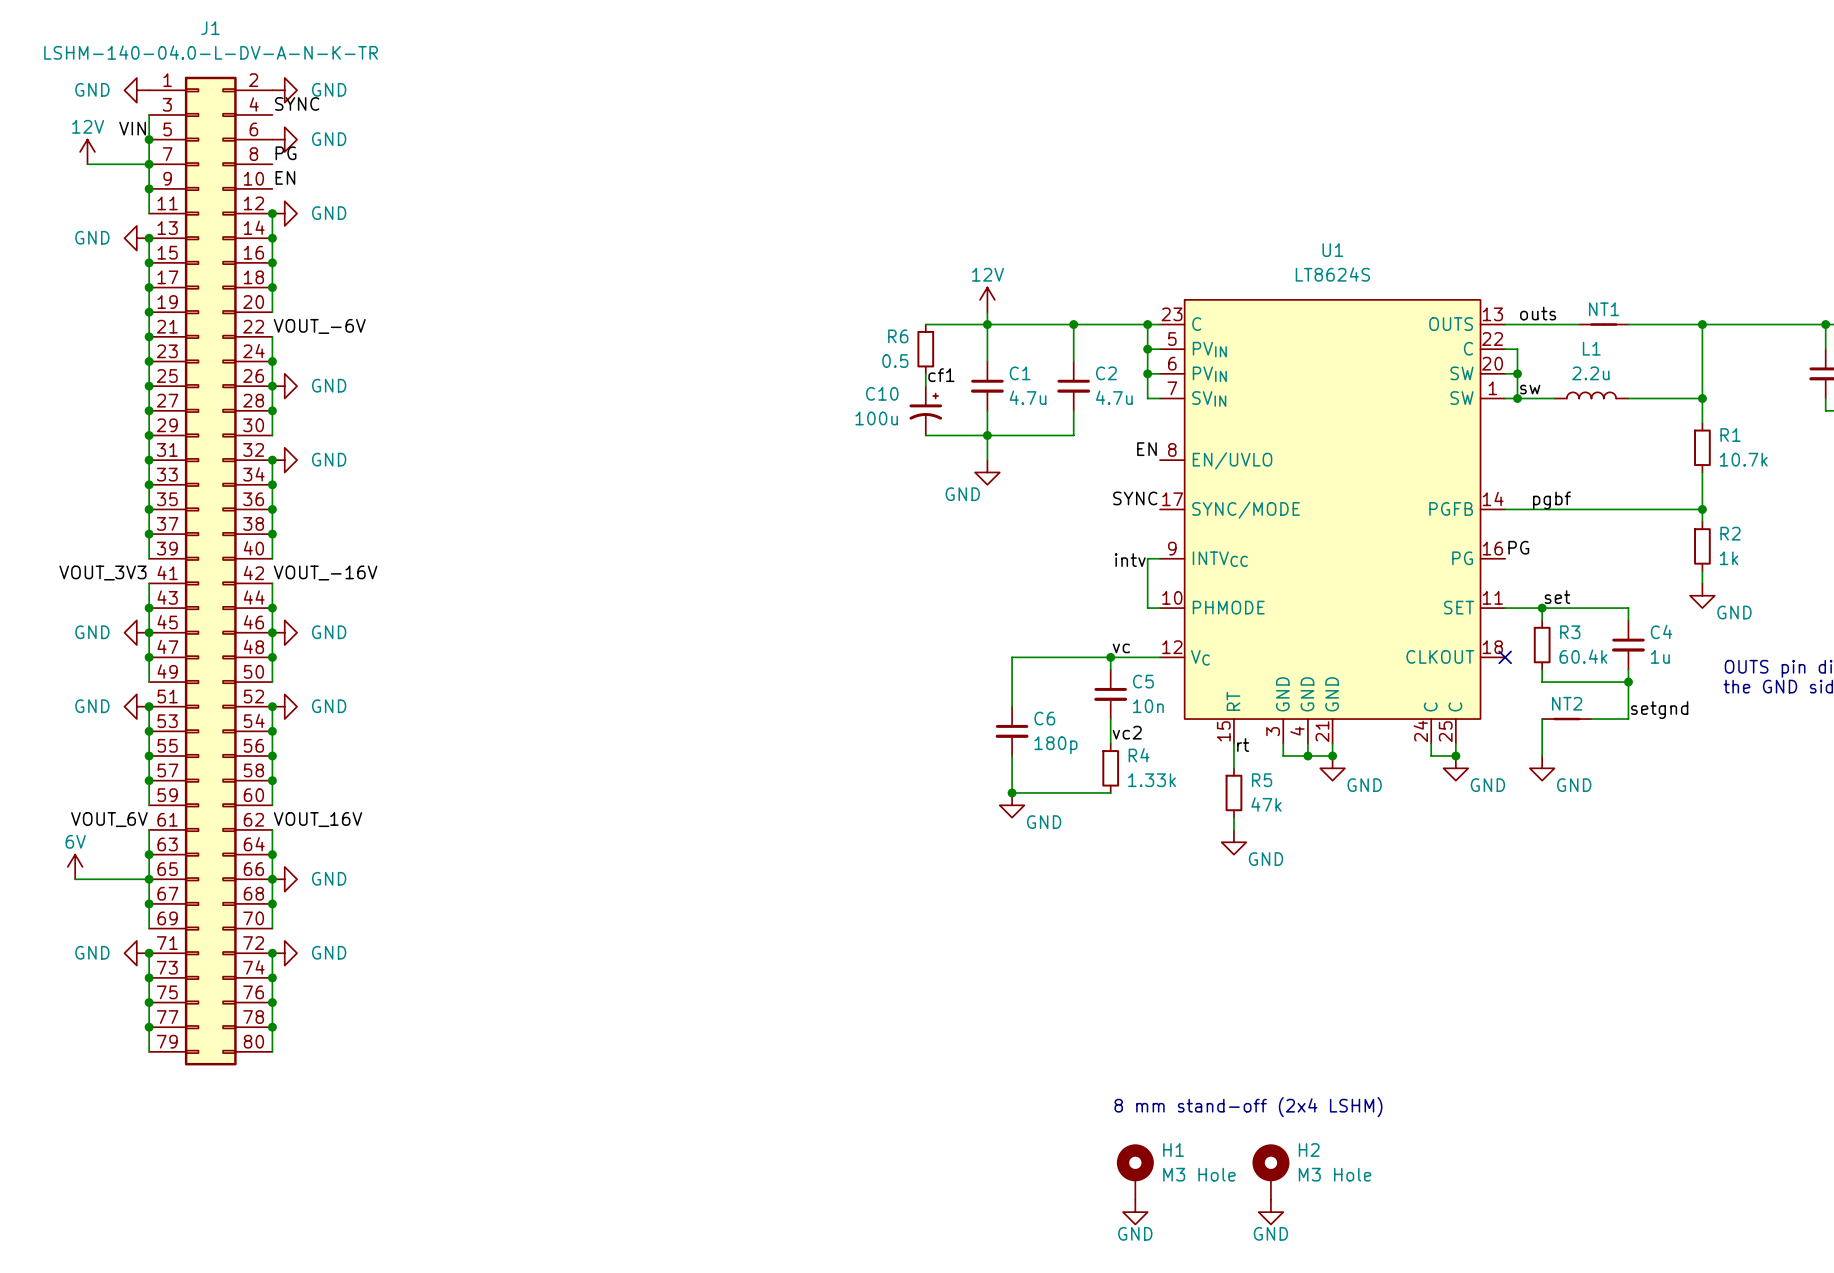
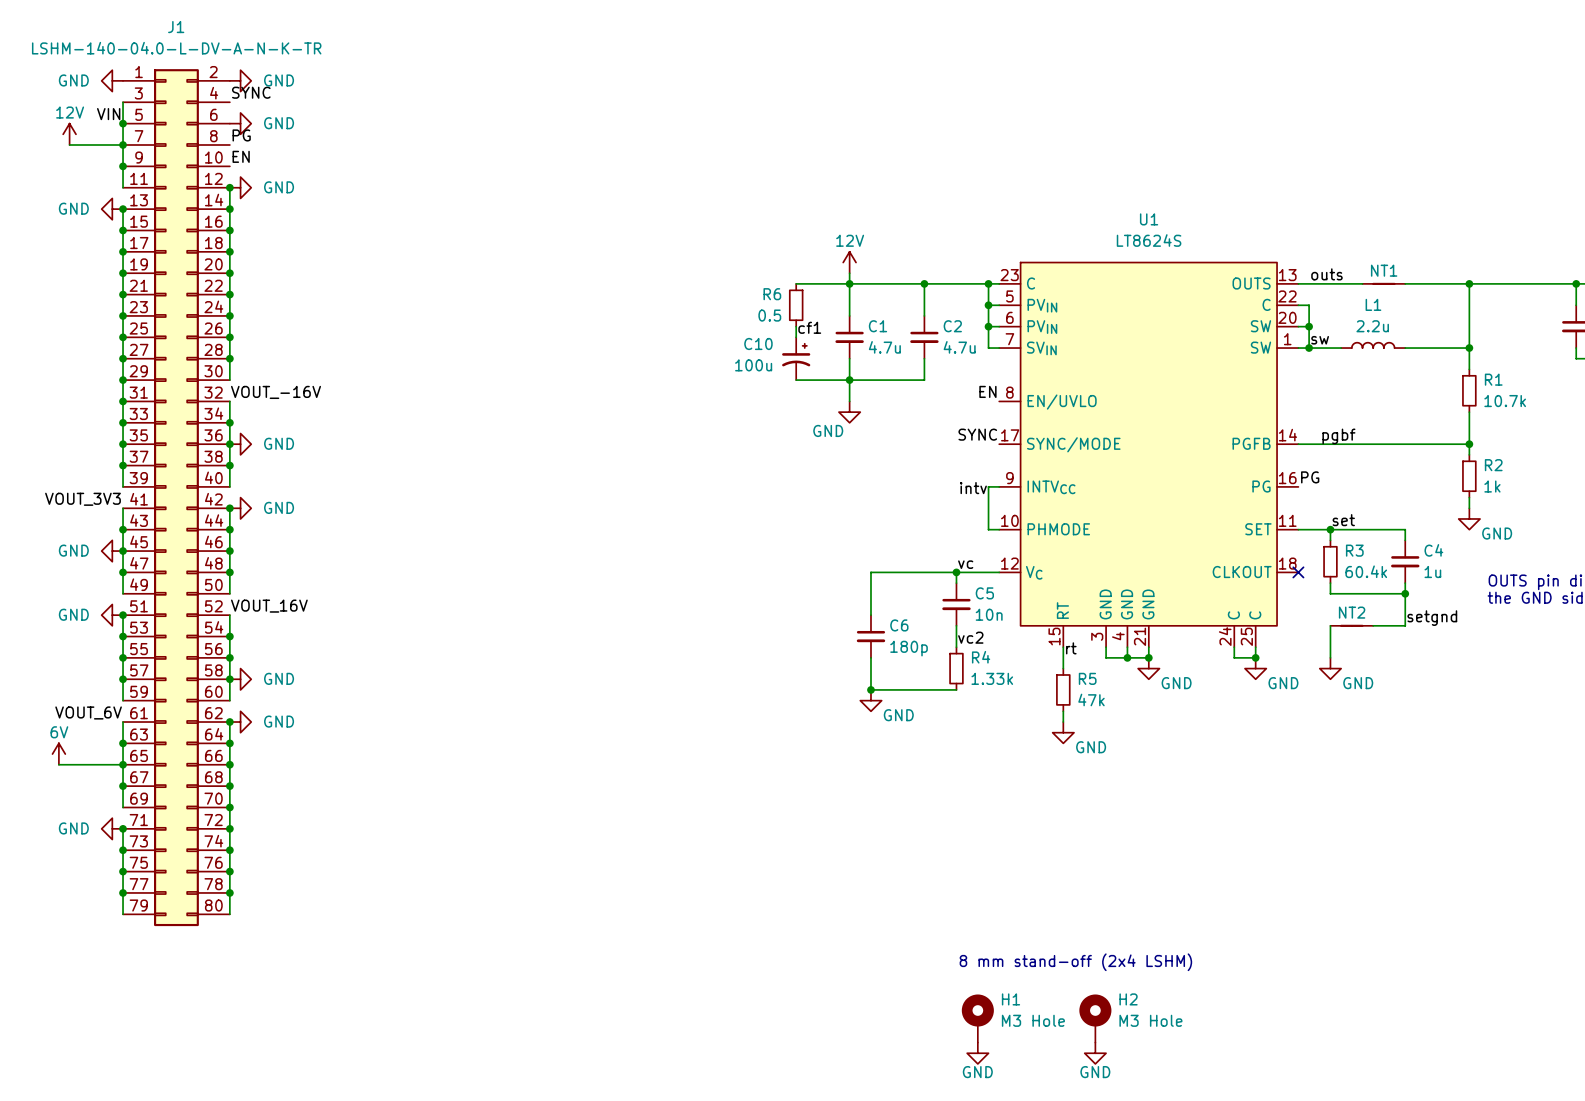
wire: none -> (229, 273) (229, 294)
junction: none -> (229, 273)
label: VOUT_-6V (319, 326) -> none
junction: none -> (229, 294)
power symbol: GND (284, 386) -> none
junction: (272, 460) -> none
power symbol position: GND (284, 460) -> GND (240, 444)
label position: VOUT_-16V (325, 573) -> VOUT_-16V (276, 392)
junction: none -> (229, 508)
power symbol position: GND (284, 632) -> GND (240, 508)
junction: (272, 706) -> none
power symbol: GND (284, 706) -> none
power symbol: none -> GND (240, 679)
label position: VOUT_16V (318, 819) -> VOUT_16V (269, 606)
junction: none -> (229, 722)
power symbol: none -> GND (240, 722)
power symbol: GND (284, 879) -> none
wire: none -> (229, 807) (229, 828)
junction: none -> (229, 807)
power symbol: GND (284, 953) -> none

